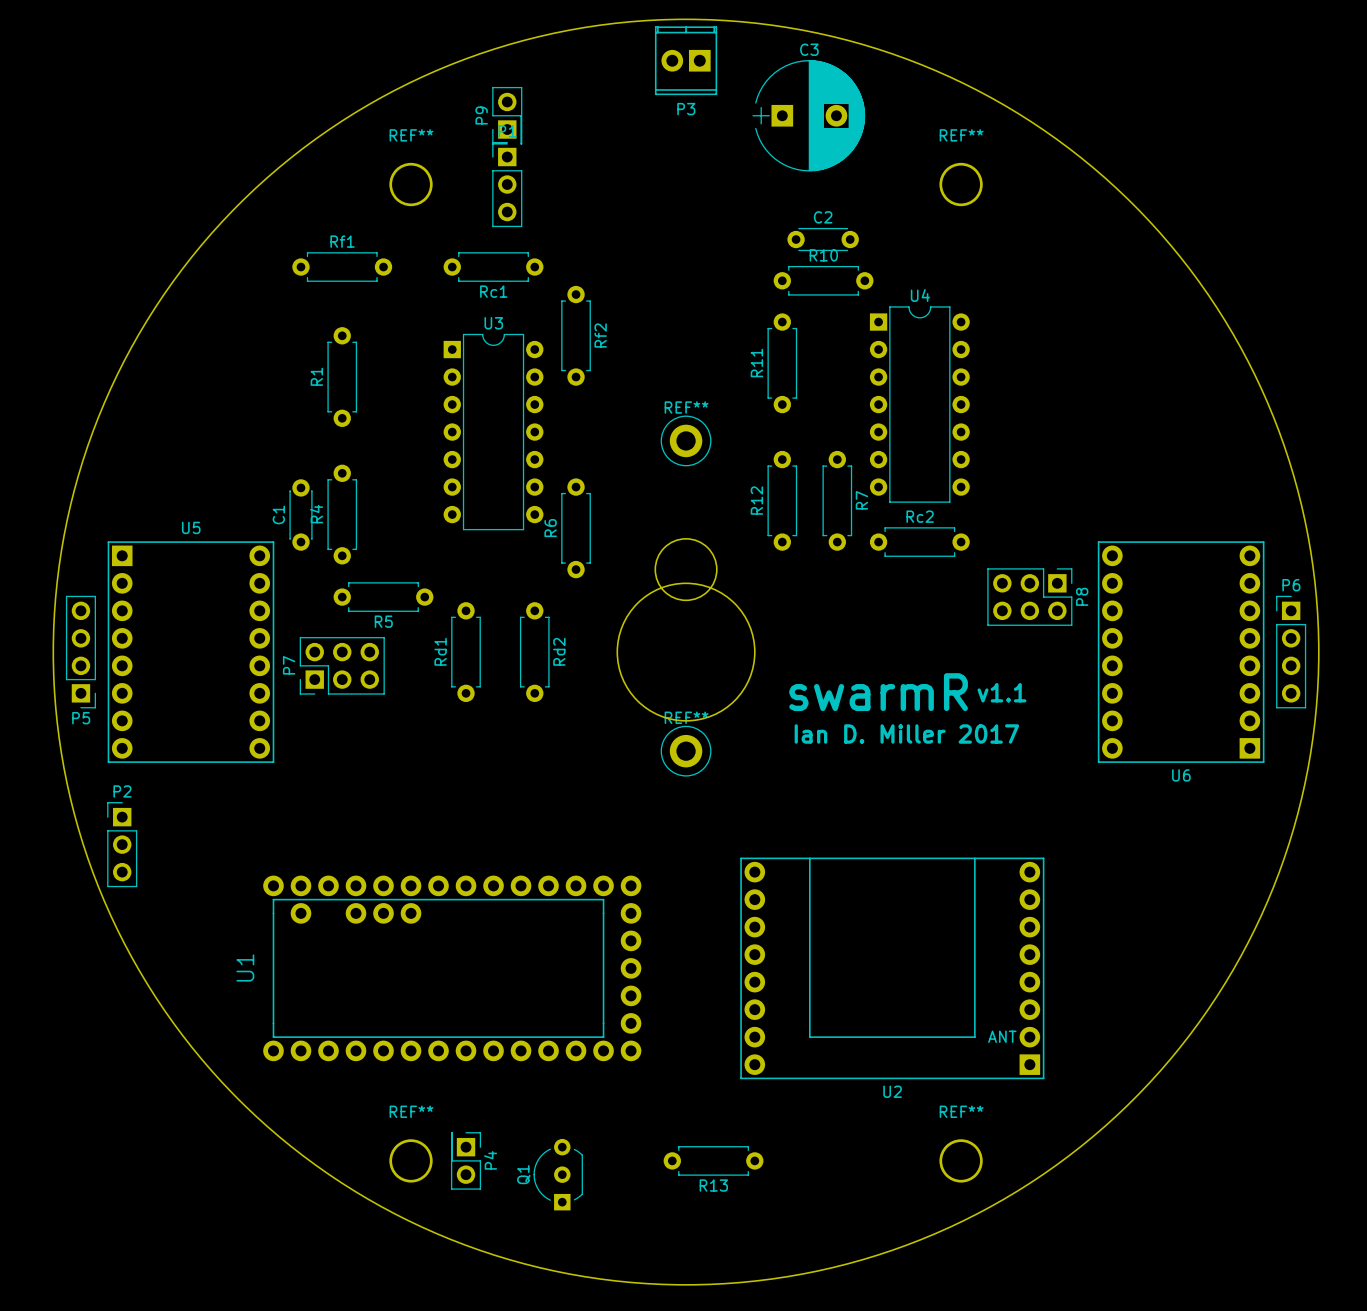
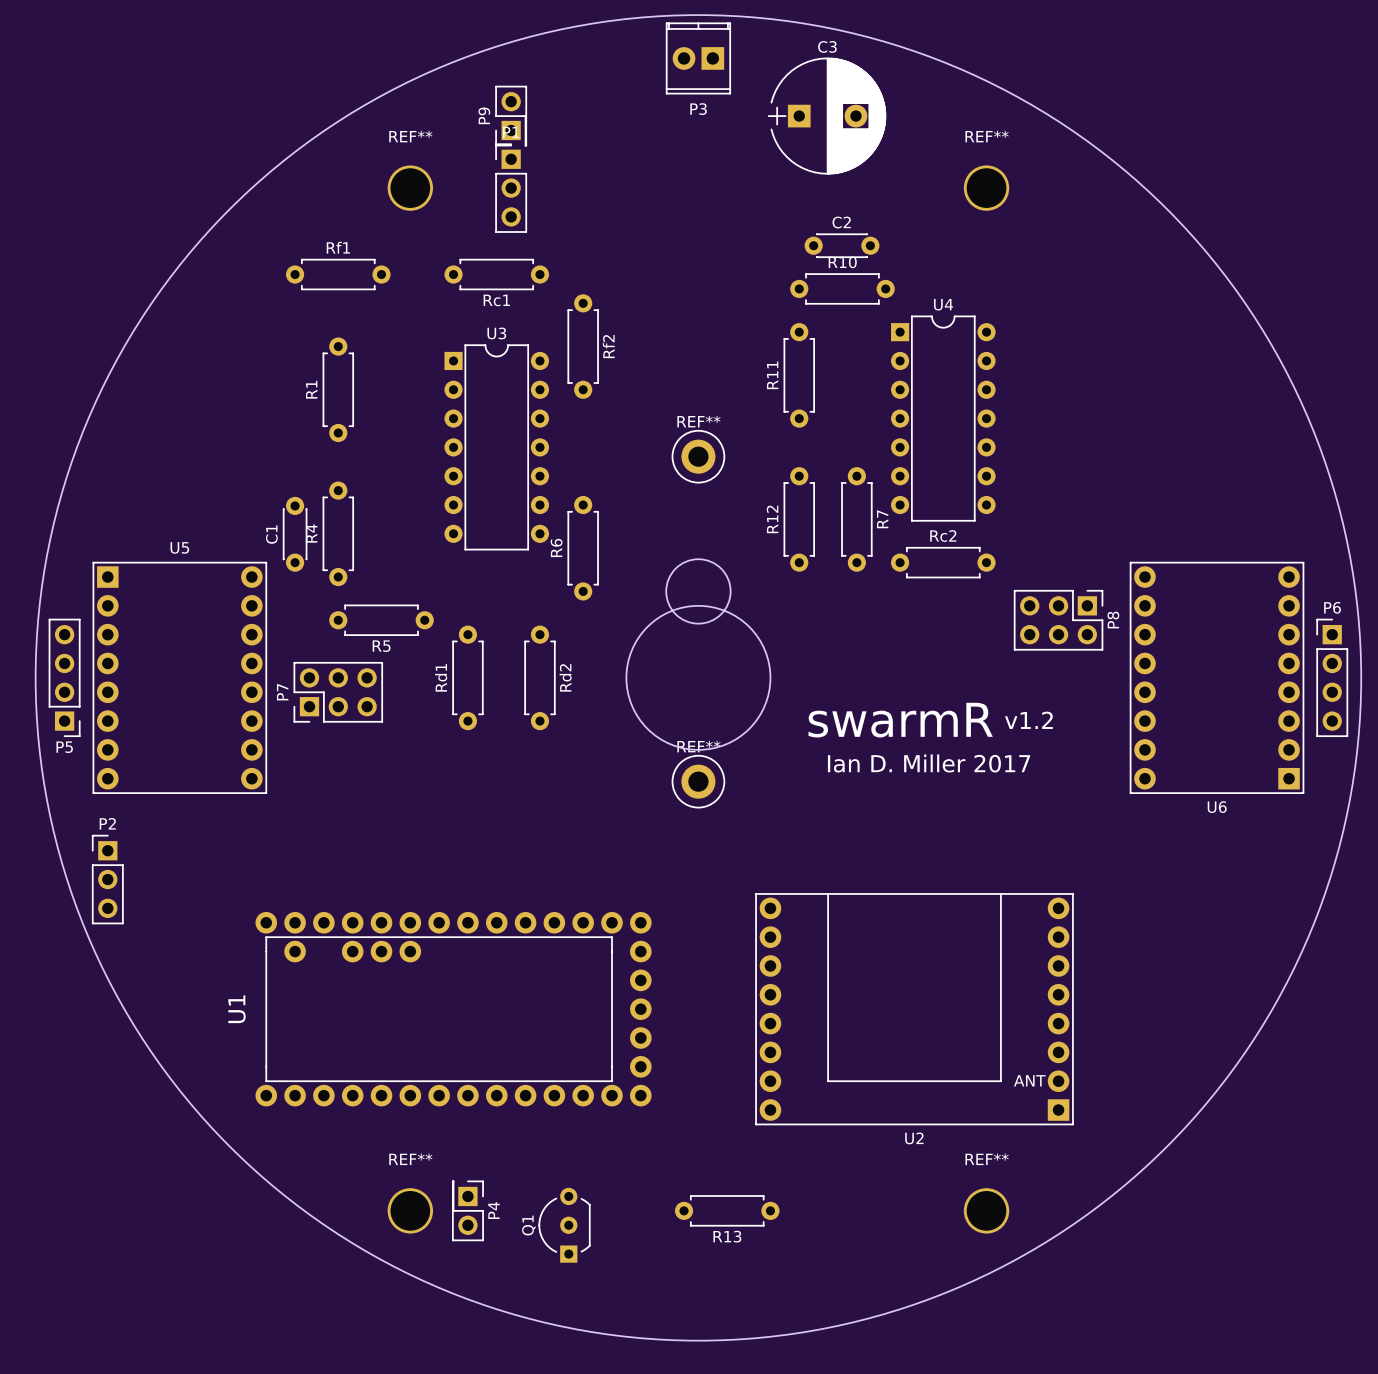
text: v1.1 (1001, 692) -> v1.2 (1028, 720)

